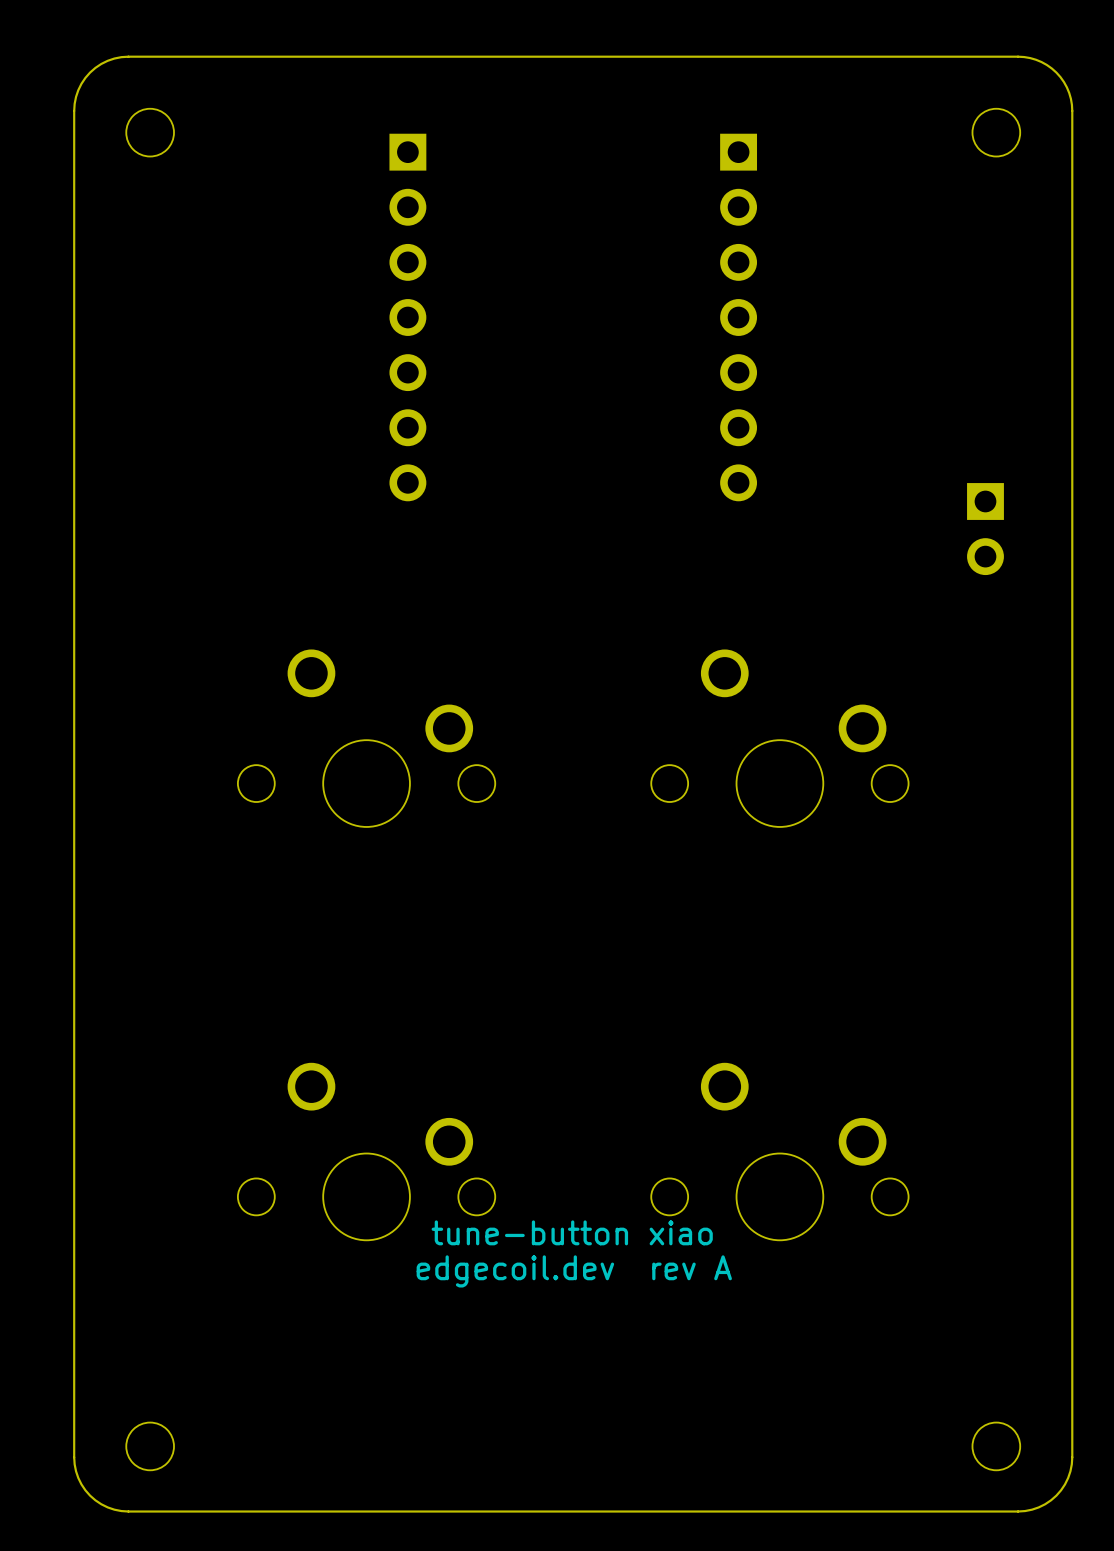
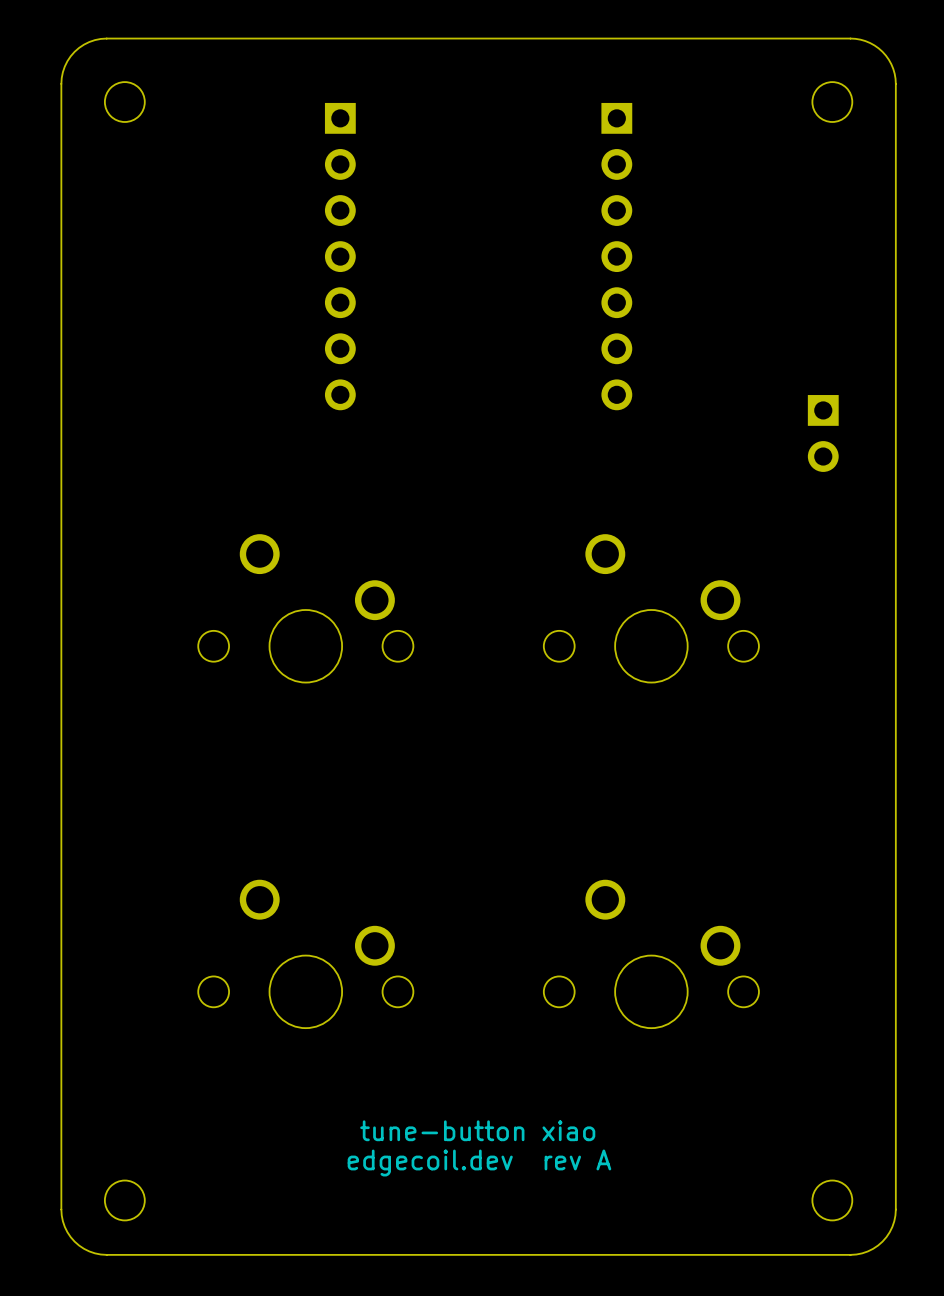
text position: tune-button xiao (572, 1232) -> tune-button xiao (477, 1130)
text position: edgecoil.dev rev A (574, 1271) -> edgecoil.dev rev A (479, 1163)

